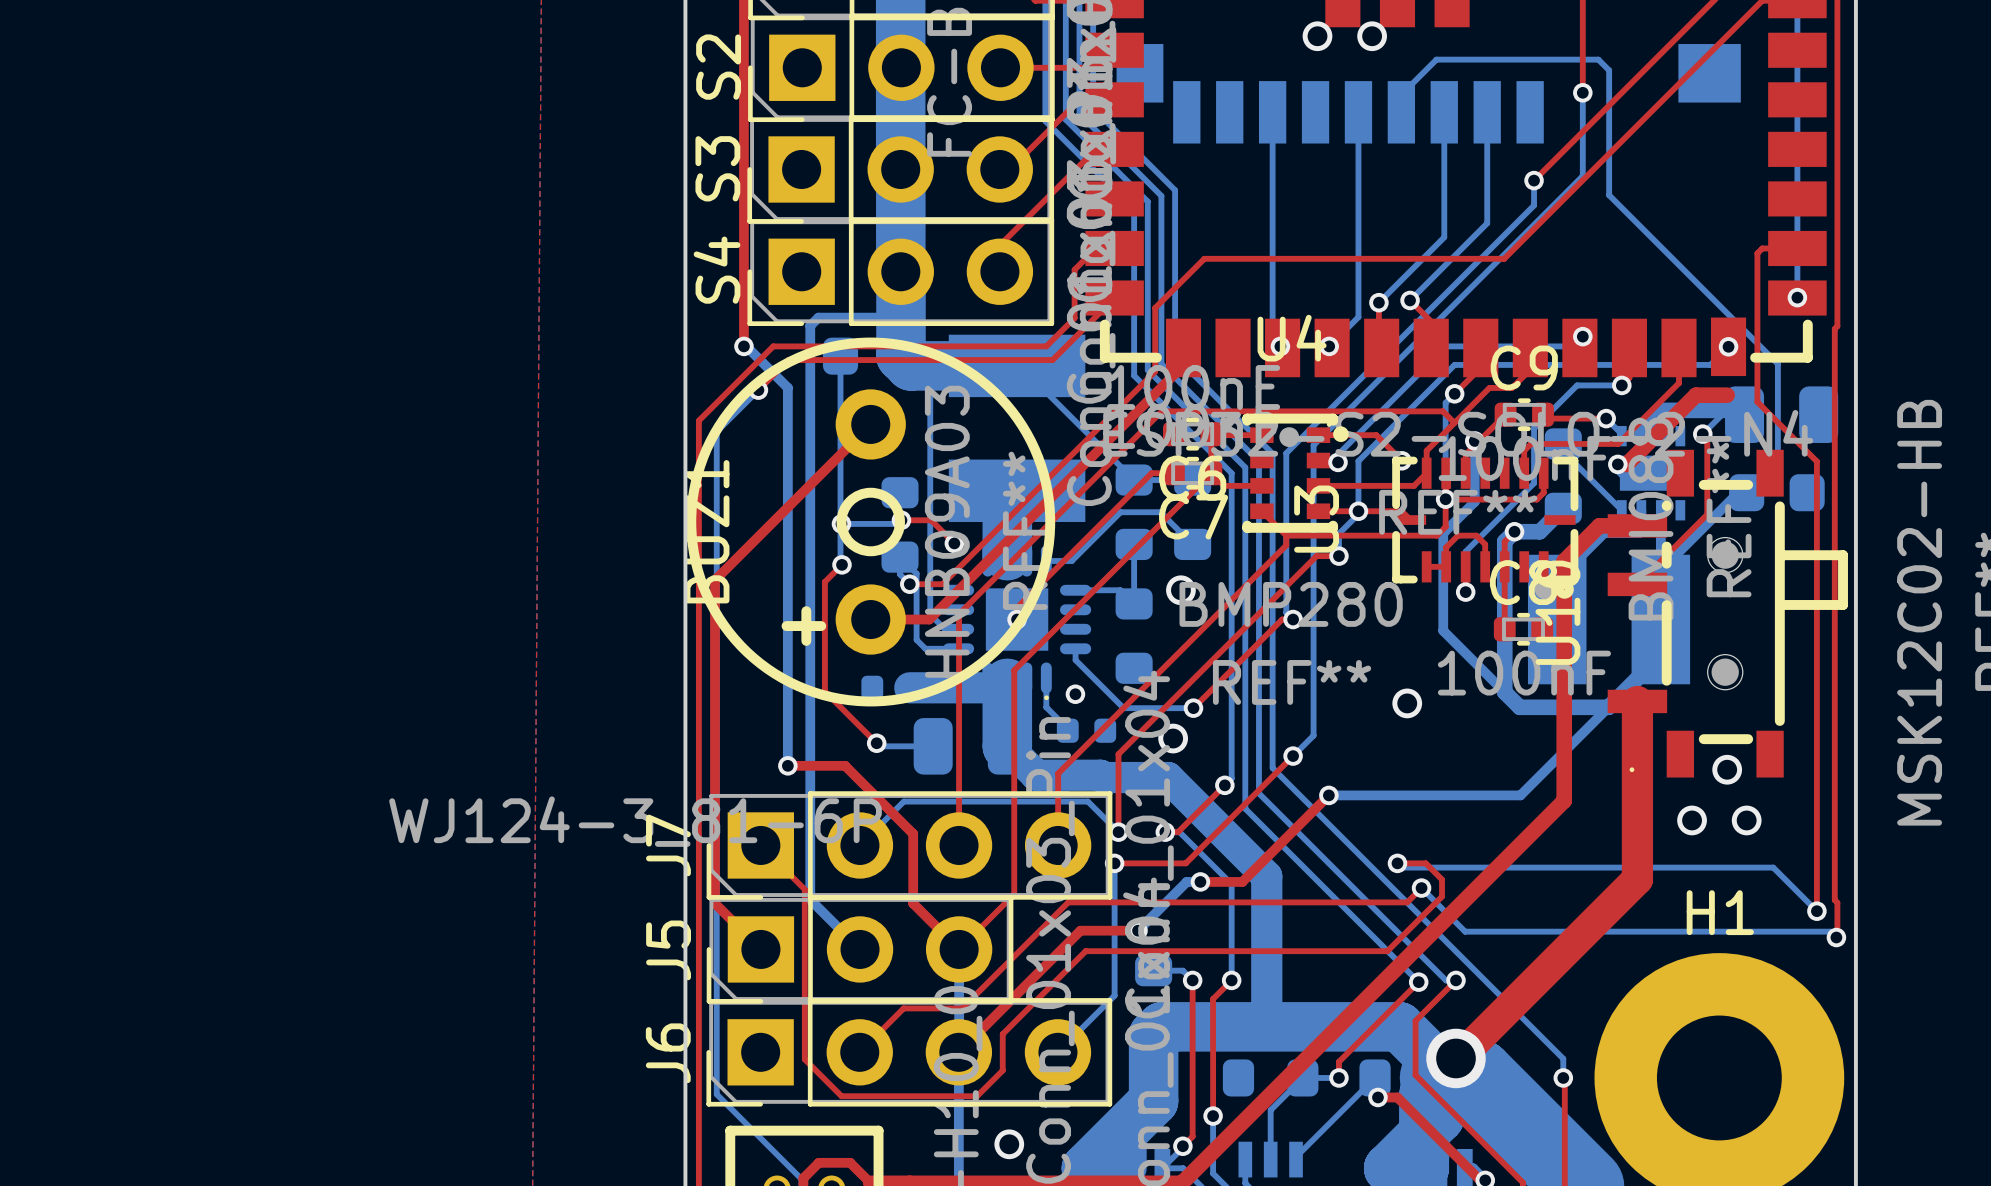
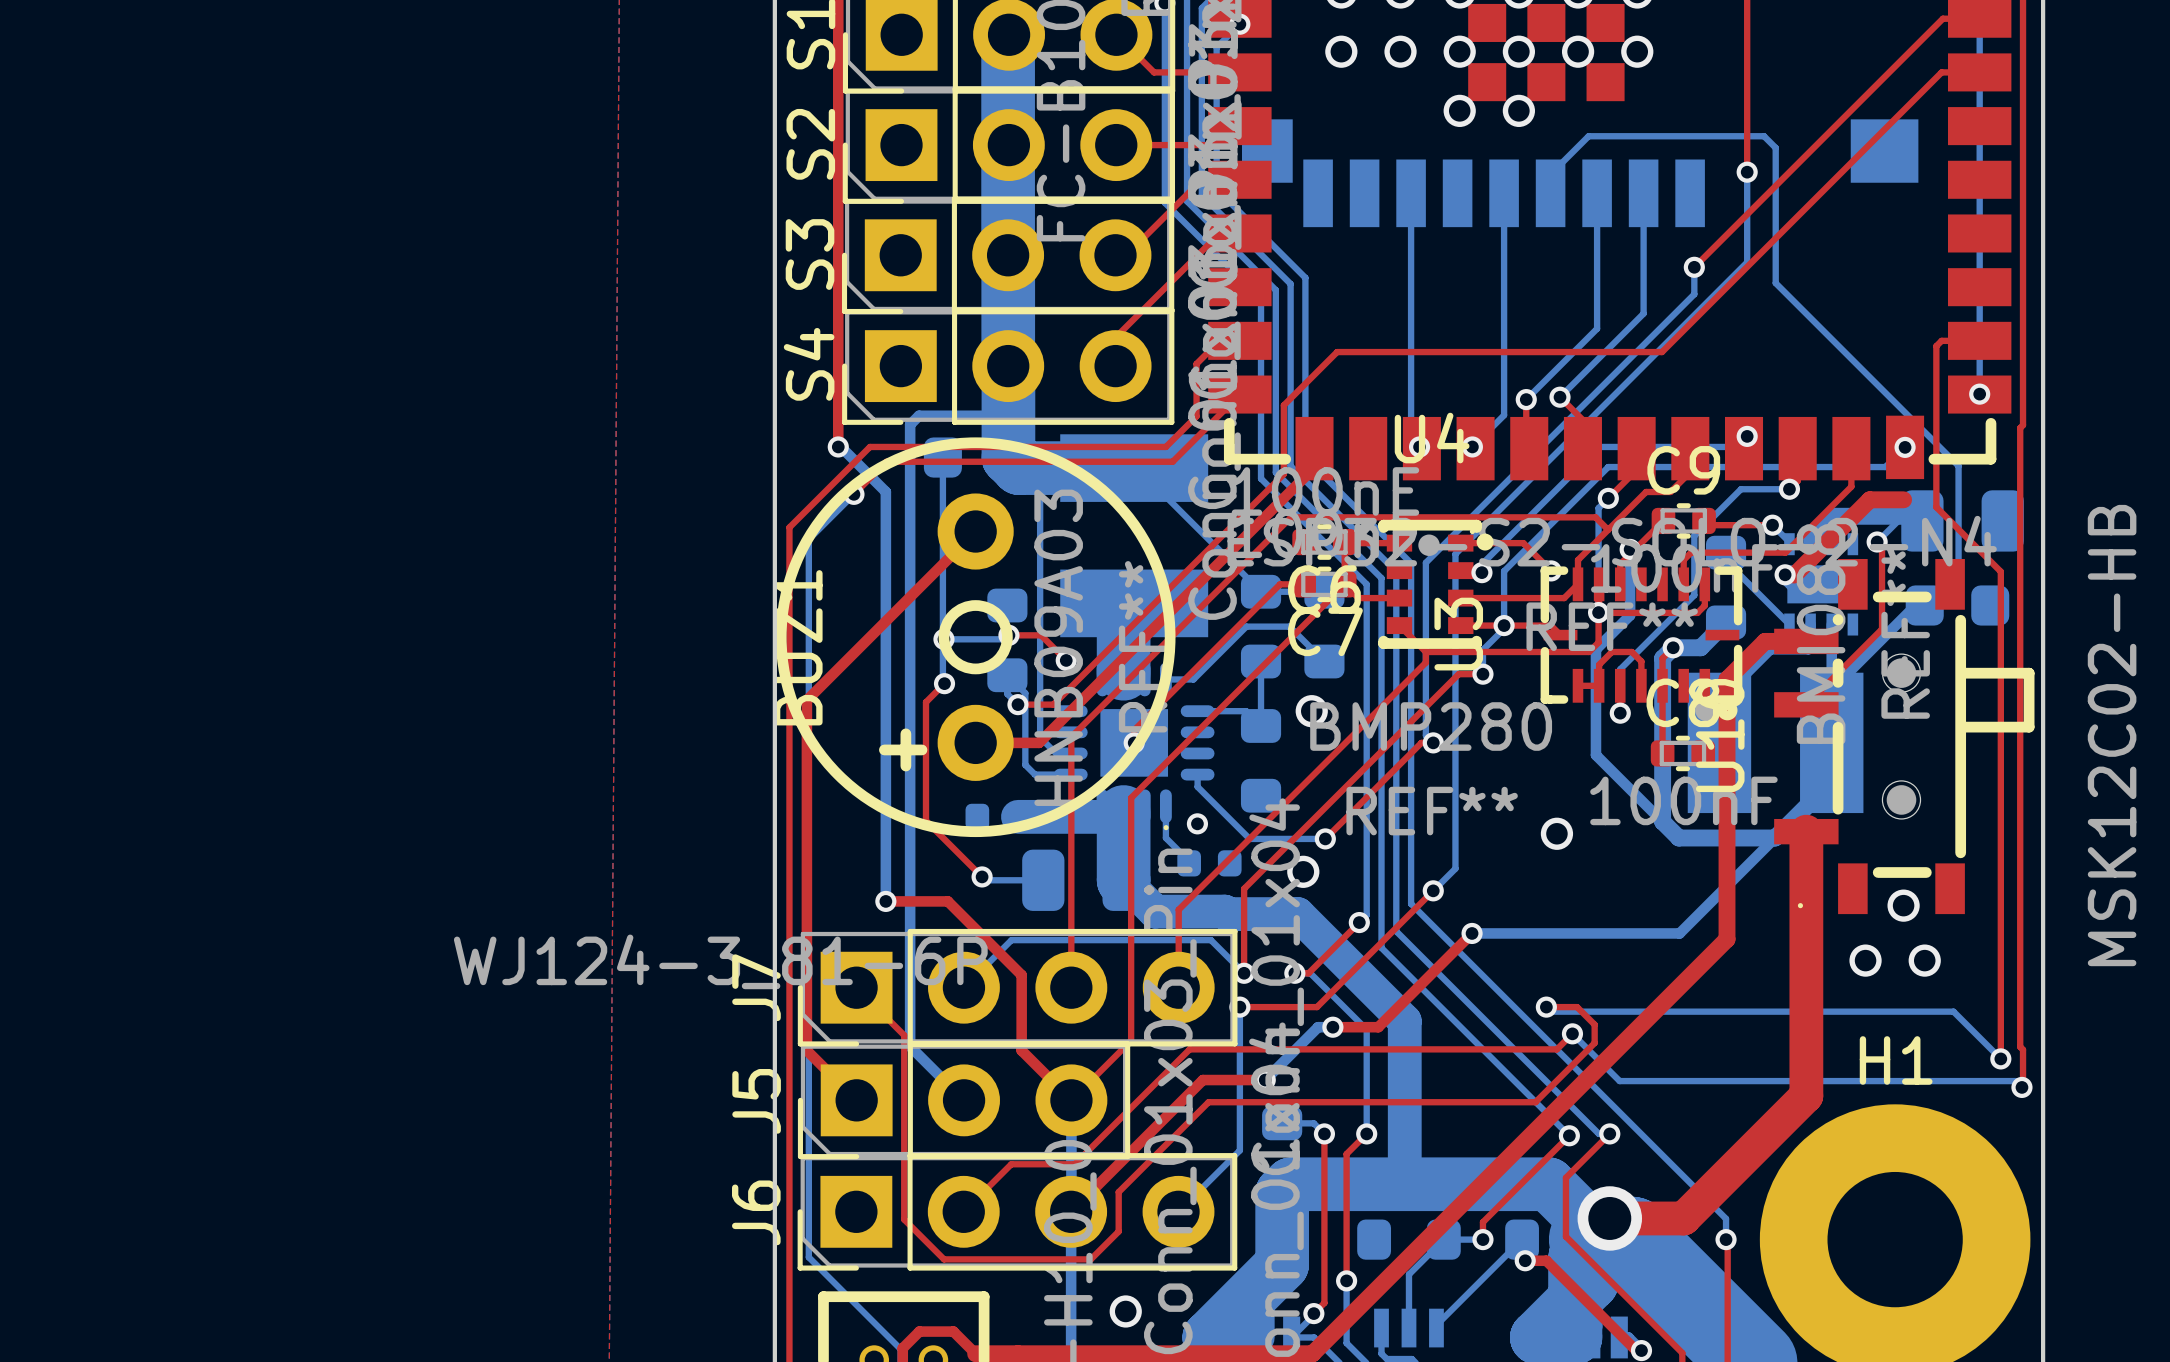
top track: (1637, 879) (1458, 1058) -> (1806, 1024) (1806, 1095) (1683, 1218) (1612, 1218)

